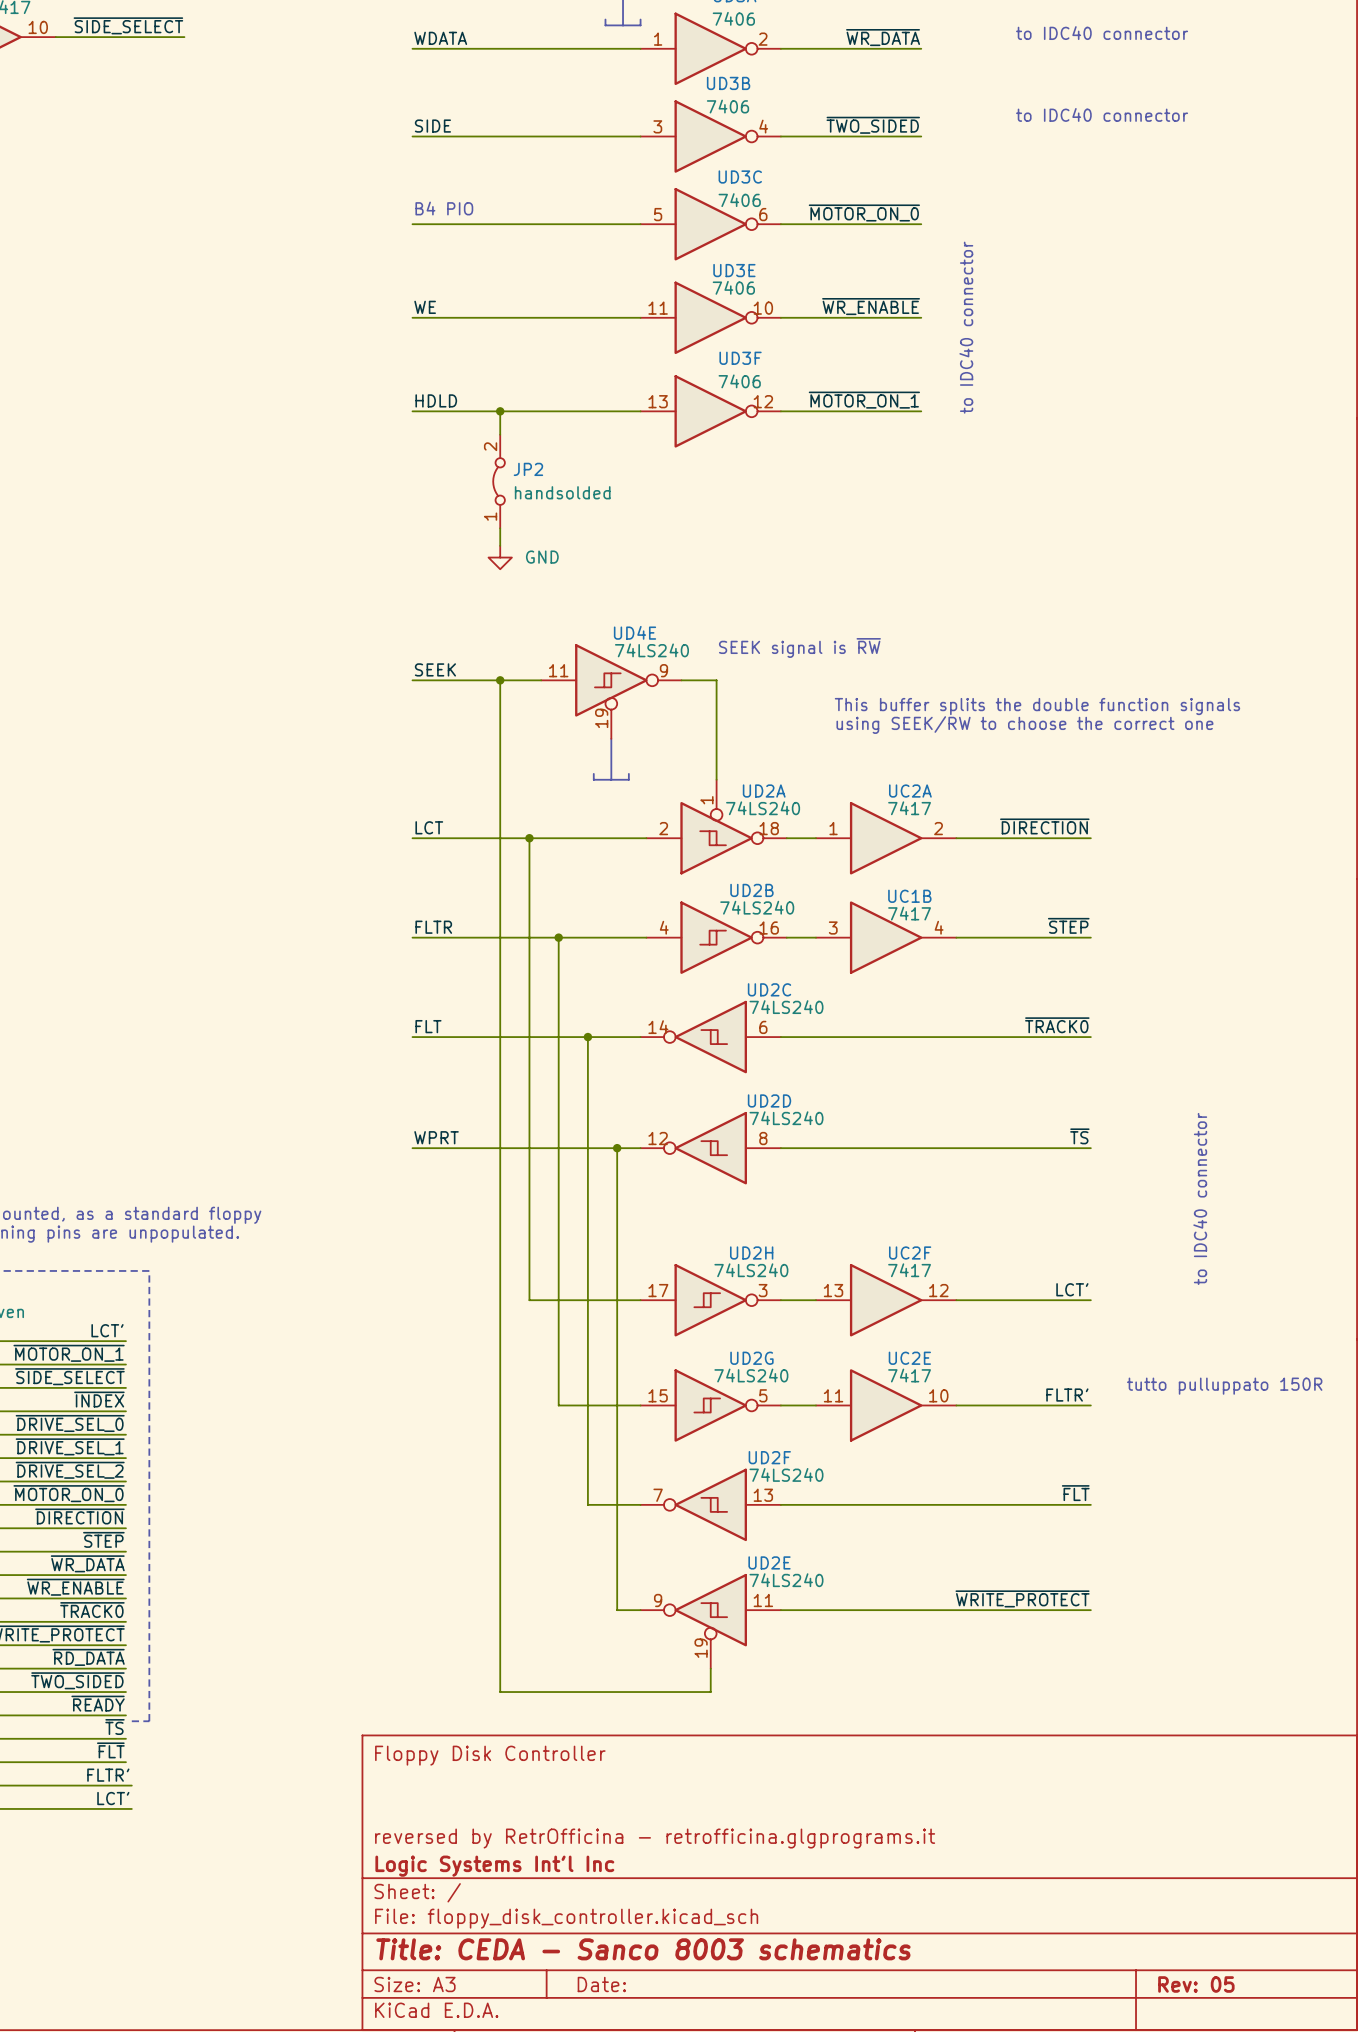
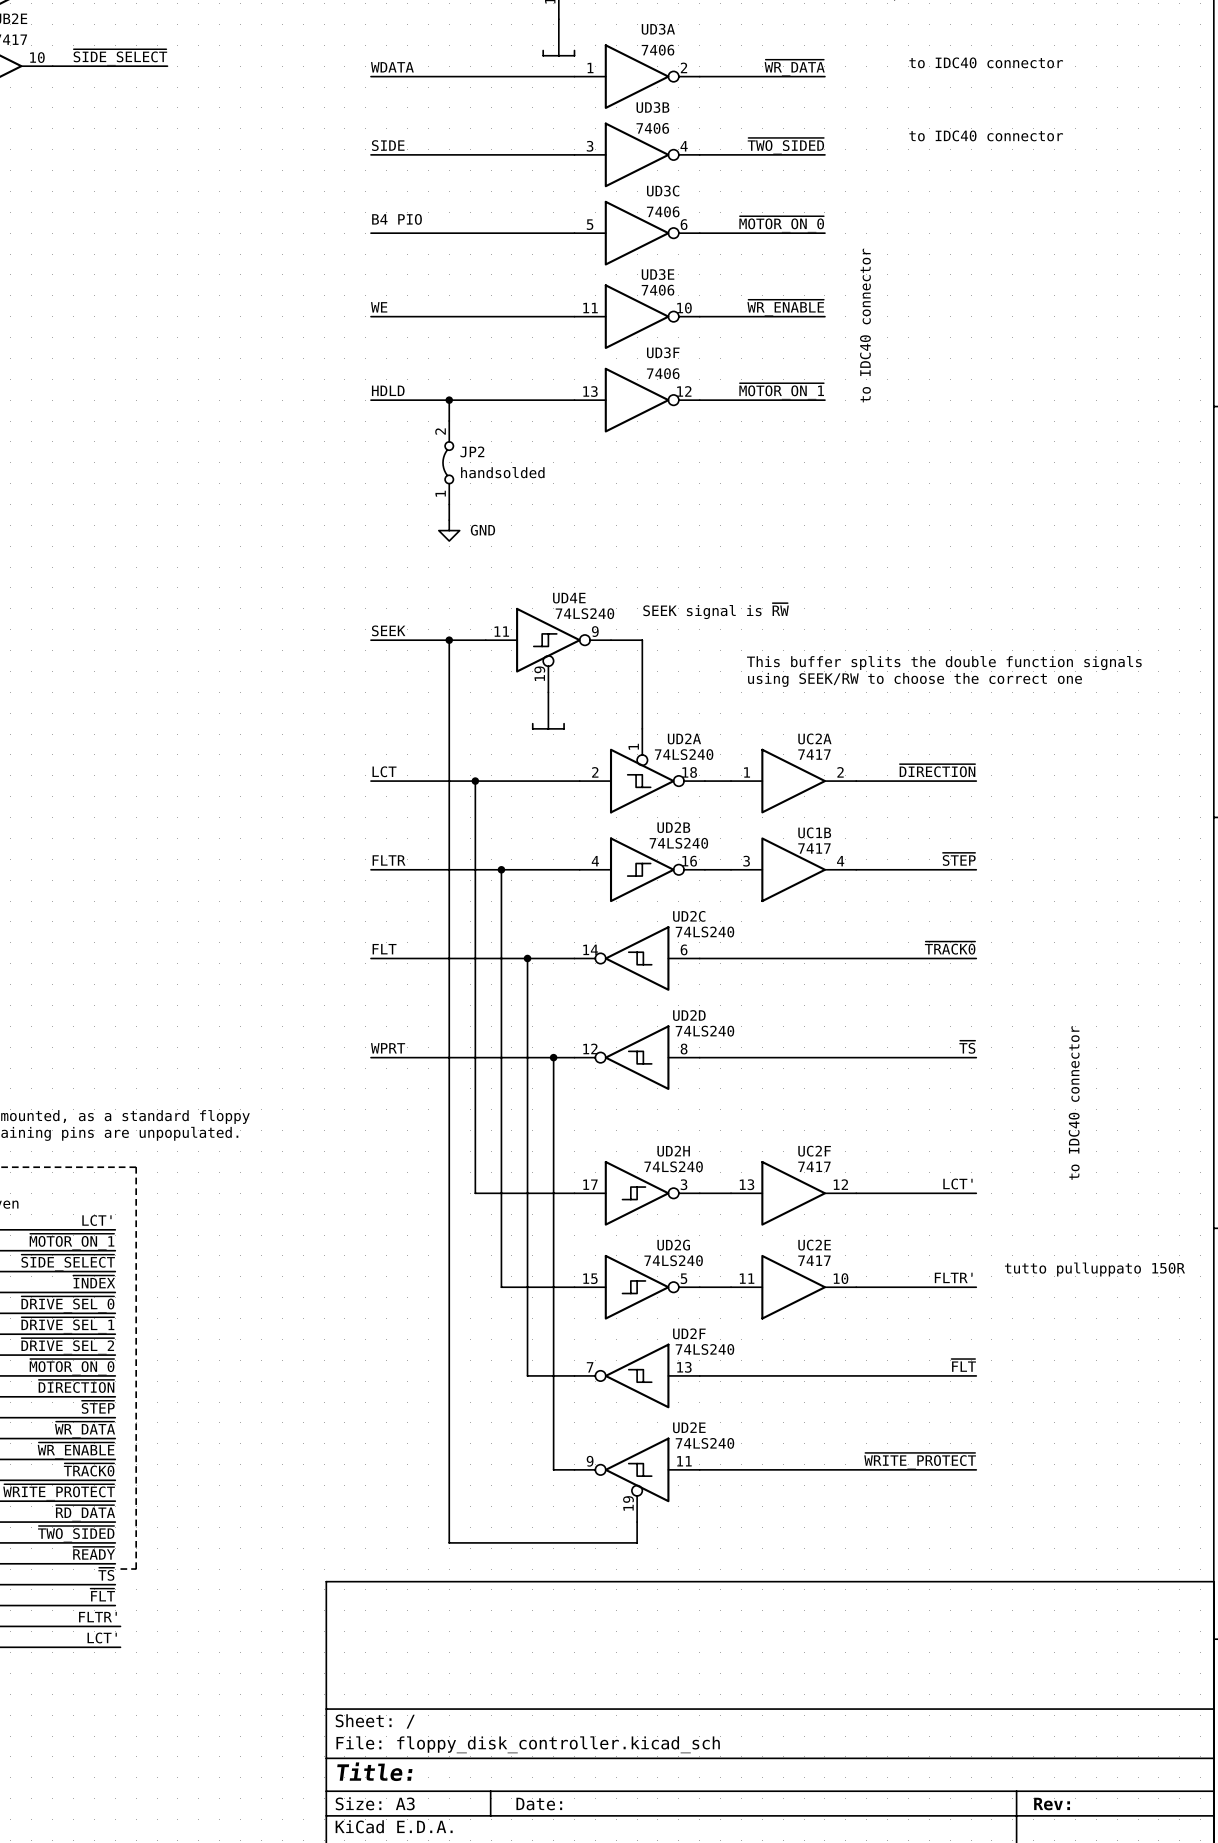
title block: Floppy Disk Controller (490, 1755) -> none
title block: reversed by RetrOfficina - retrofficina.glgprograms.it (655, 1838) -> none
title block: Logic Systems Int'l Inc (494, 1866) -> none
title block: Title: CEDA - Sanco 8003 schematics (643, 1949) -> Title: (374, 1771)
title block: Rev: 05 (1196, 1984) -> Rev: (1052, 1804)

